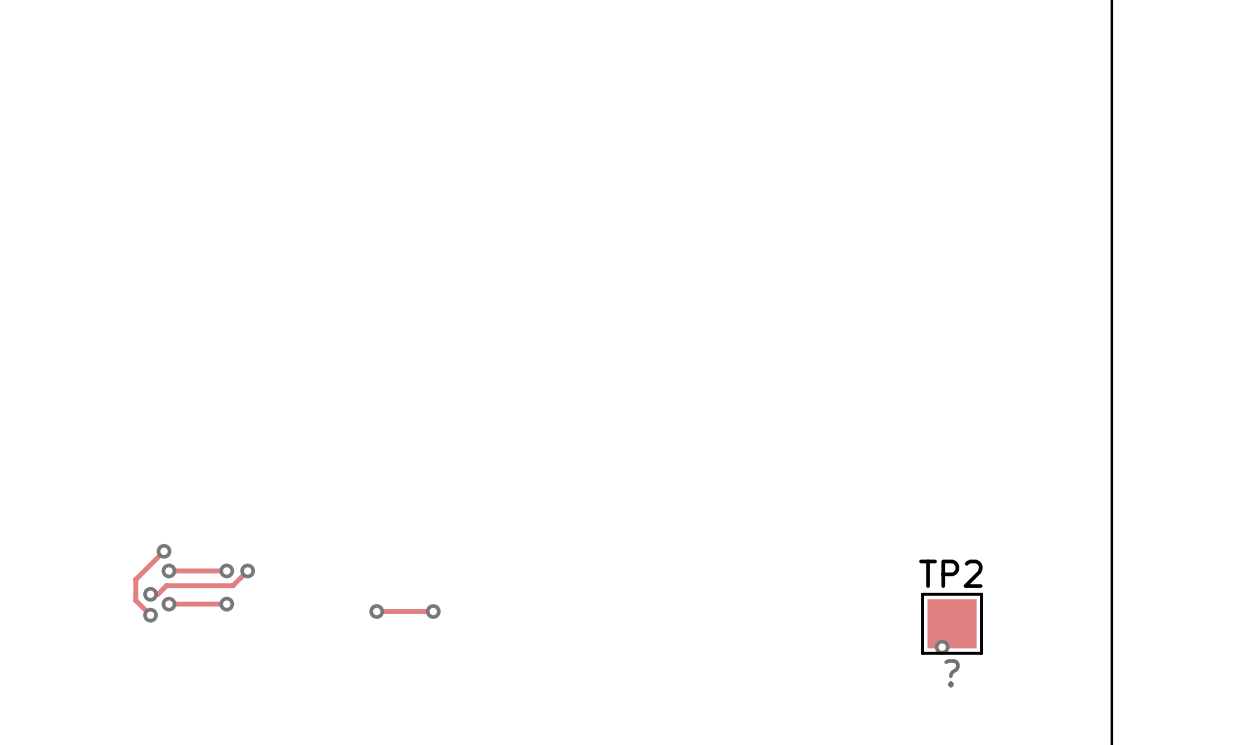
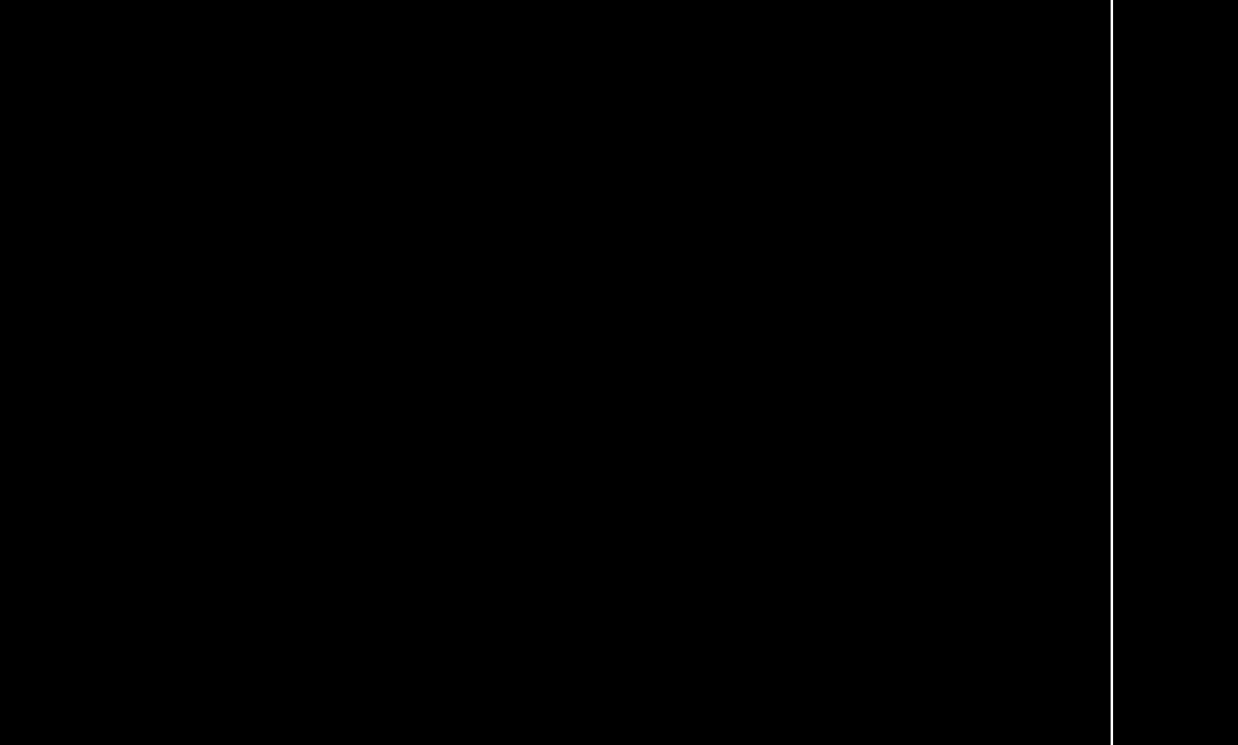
track: (164, 551) (135, 579) (135, 600) (150, 615) -> none
via: (164, 551) -> none
track: (168, 570) (226, 570) -> none
via: (168, 570) -> none
via: (226, 570) -> none
track: (247, 570) (232, 585) (166, 585) (157, 594) (150, 594) -> none
via: (247, 570) -> none
via: (150, 594) -> none
track: (168, 604) (226, 604) -> none
via: (168, 604) -> none
via: (226, 604) -> none
track: (376, 611) (433, 611) -> none
via: (376, 611) -> none
via: (433, 611) -> none
via: (150, 615) -> none
TP2: ? (952, 623) -> none
via: (942, 647) -> none

